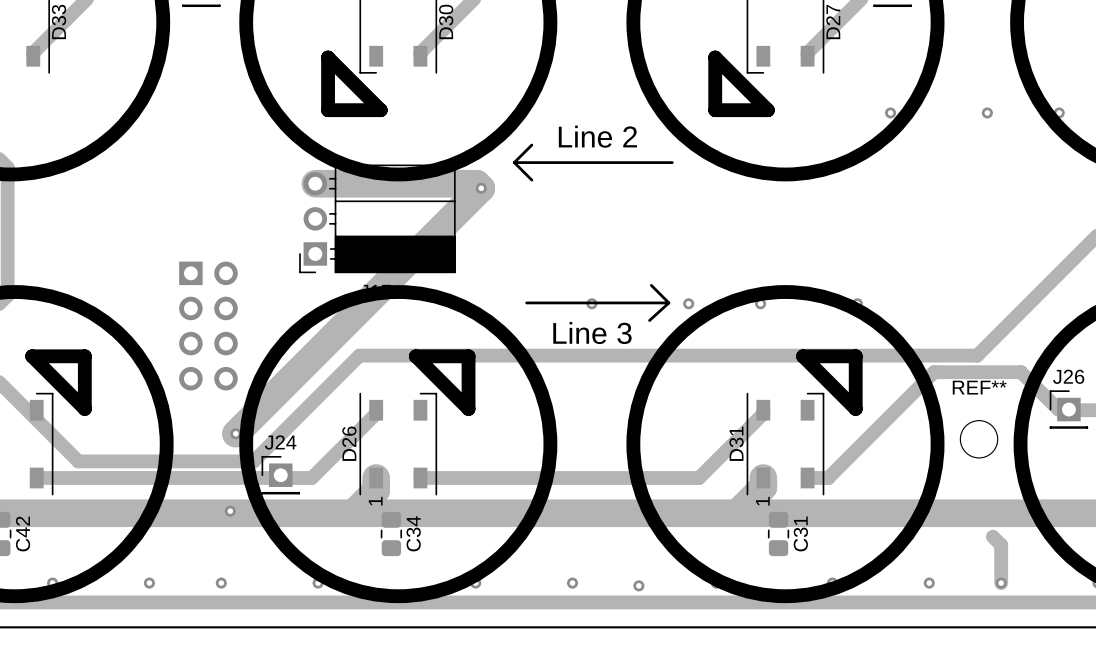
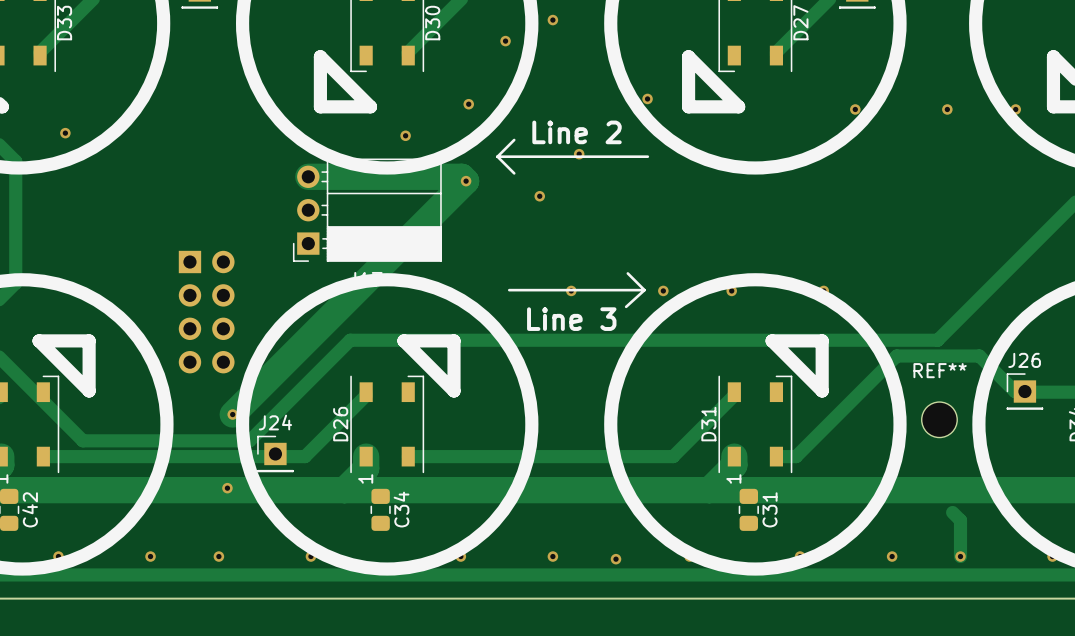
via: none -> (552, 20)
via: none -> (505, 41)
via: none -> (647, 98)
via: none -> (468, 104)
via: none -> (65, 133)
via: none -> (405, 135)
via: none -> (579, 154)
via: none -> (539, 196)

